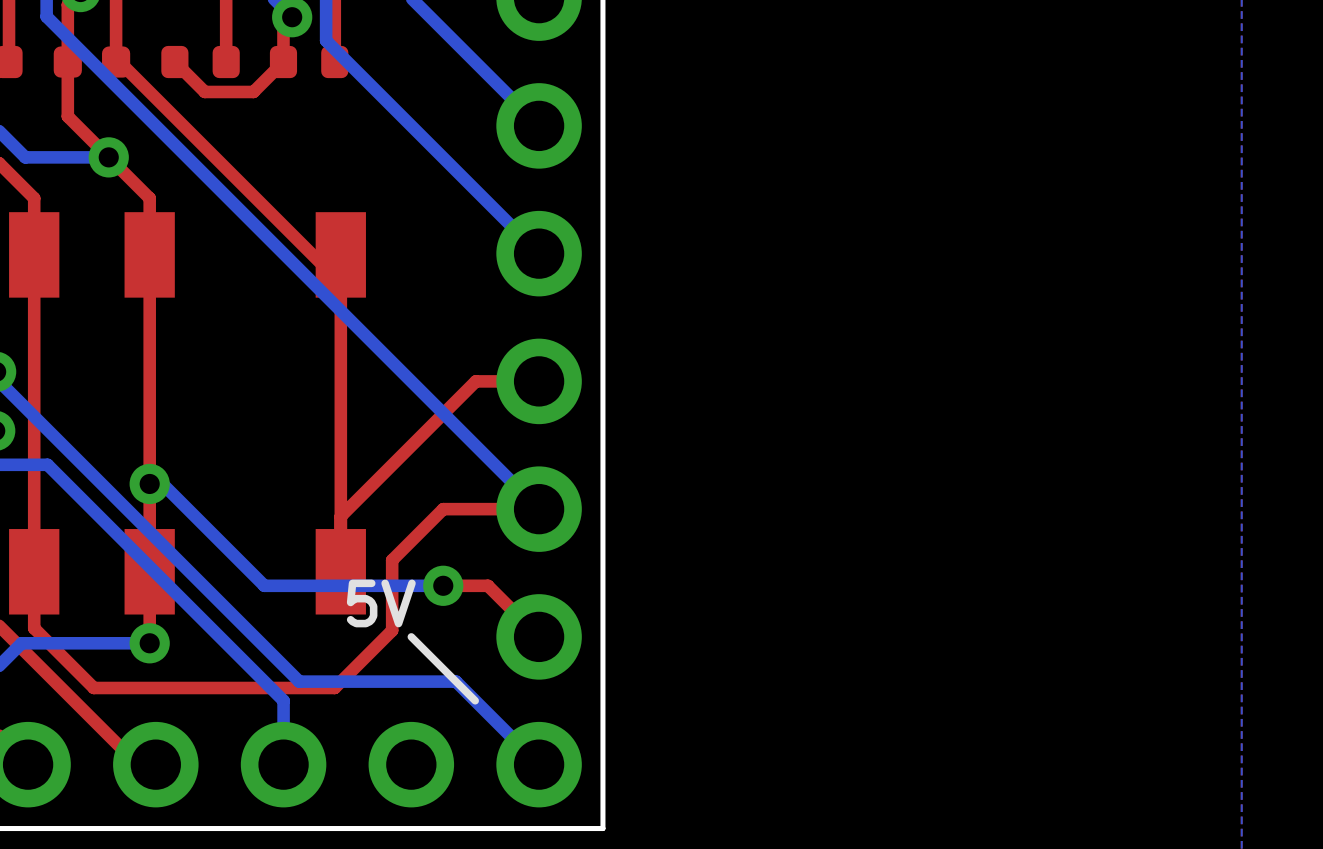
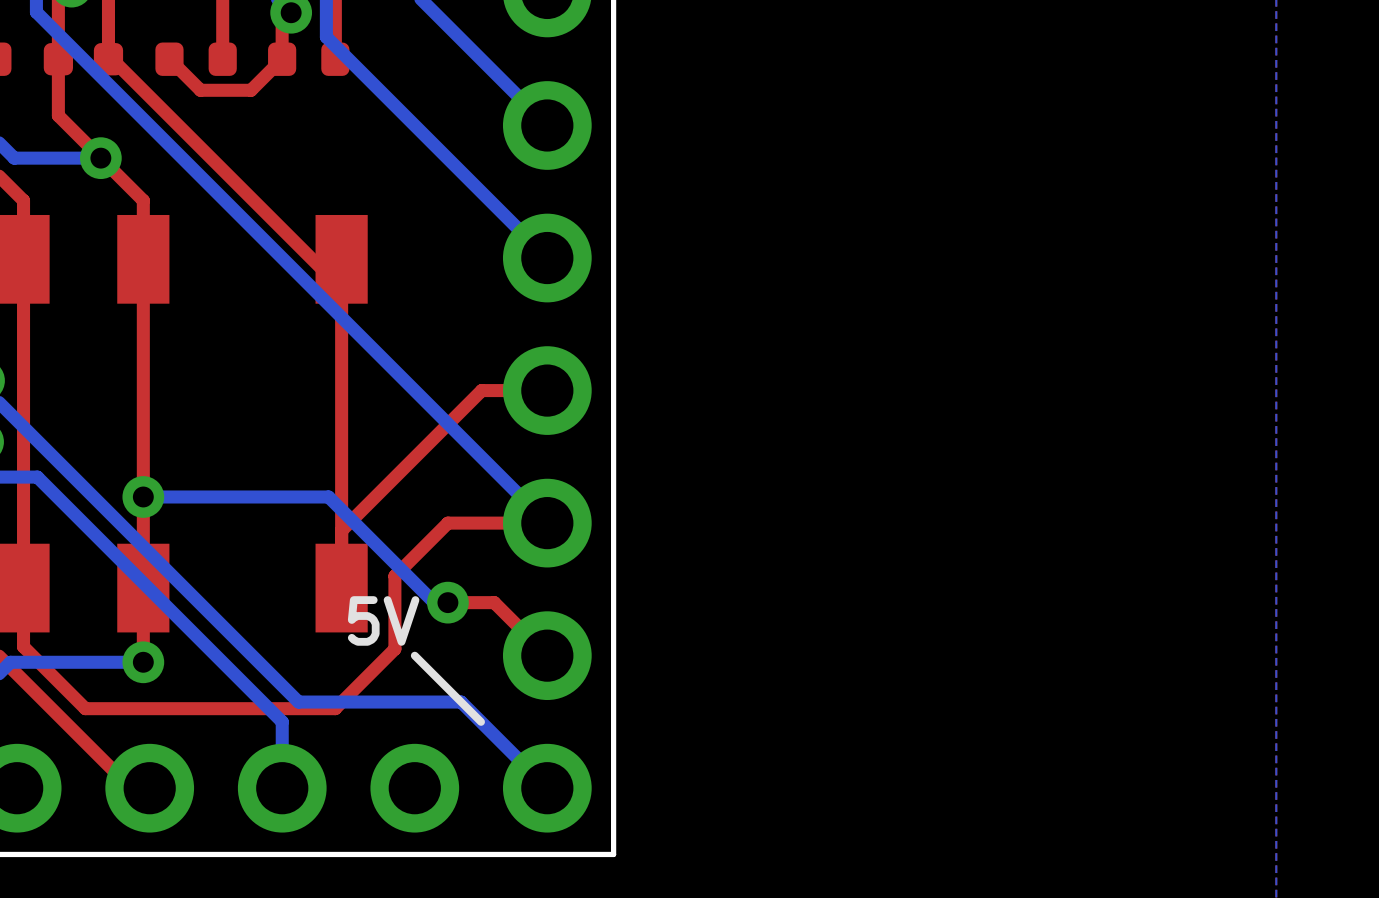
bottom track: (162, 483) (264, 585) (430, 585) -> (156, 496) (328, 496) (434, 602)

